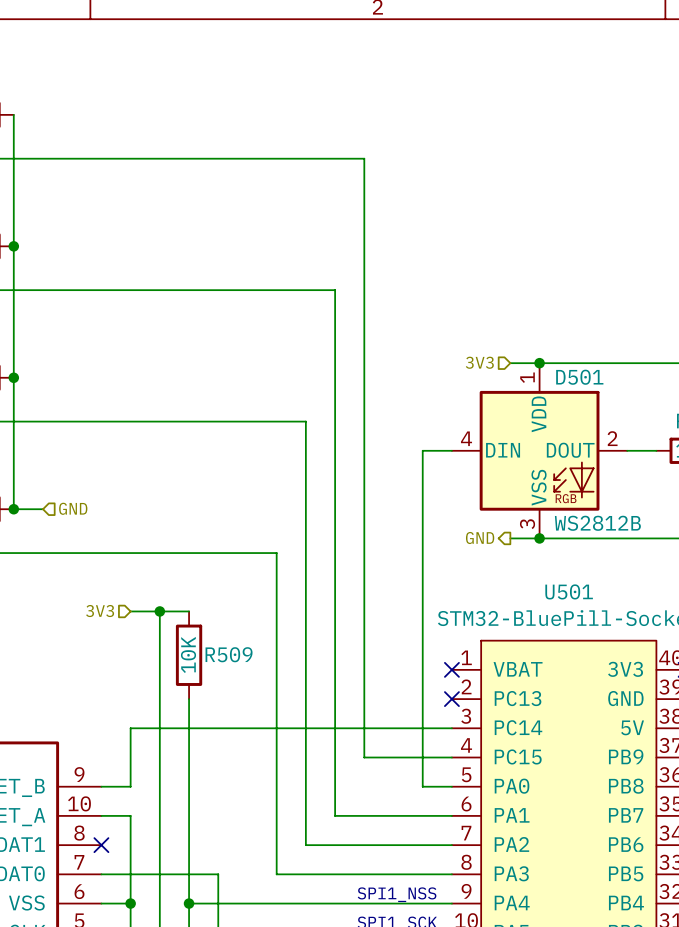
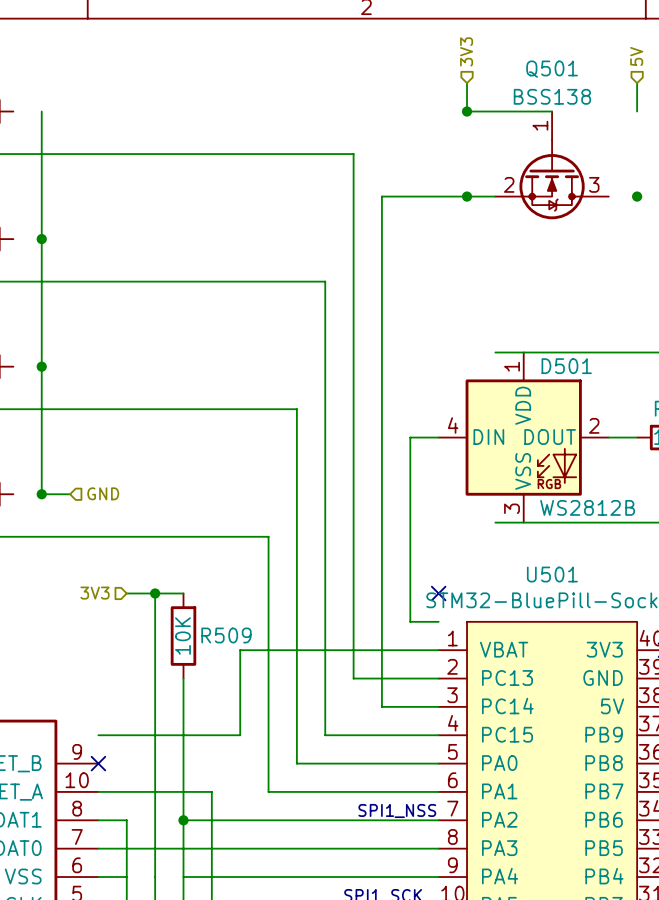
hierarchical label: none -> 3V3 (466, 51)
hierarchical label: none -> 5V (636, 56)
wire: none -> (467, 83) (467, 111) (552, 111)
wire: none -> (637, 83) (637, 111)
wire: (13, 114) (13, 509) (43, 509) -> (41, 111) (41, 494) (70, 494)
junction: none -> (467, 111)
Q501: none -> BSS138 (552, 165)
junction: none -> (467, 196)
junction: none -> (637, 196)
junction position: (13, 246) -> (41, 239)
hierarchical label: 3V3 (479, 362) -> none
junction: (539, 363) -> none
junction position: (13, 377) -> (41, 366)
hierarchical label position: GND (73, 508) -> GND (103, 493)
junction position: (13, 509) -> (41, 494)
hierarchical label: GND (480, 537) -> none
junction: (539, 538) -> none
no-connect mark: none -> (438, 593)
wire: (422, 640) (422, 786) -> (410, 621) (438, 621)
wire: none -> (438, 650) (240, 650) (240, 735) (98, 735)
no-connect mark: (451, 669) -> none
wire: (364, 699) (364, 757) -> (325, 735) (353, 735)
wire: none -> (353, 678) (438, 678)
no-connect mark: (451, 699) -> none
wire: (393, 728) (130, 728) (130, 786) (101, 786) -> (381, 706) (381, 196) (495, 196)
wire: (335, 757) (335, 815) -> (268, 791) (325, 791)
wire: (305, 786) (305, 845) -> (183, 820) (296, 820)
wire: none -> (296, 763) (410, 763)
wire: (130, 815) (130, 845) -> (98, 820) (126, 820)
wire: (276, 815) (276, 874) -> (126, 791) (211, 791) (211, 848) (268, 848)
no-connect mark position: (101, 845) -> (98, 763)
junction: none -> (183, 820)
text position: SPI1_NSS (397, 894) -> SPI1_NSS (397, 810)
junction: (130, 903) -> none
junction: (189, 903) -> none

